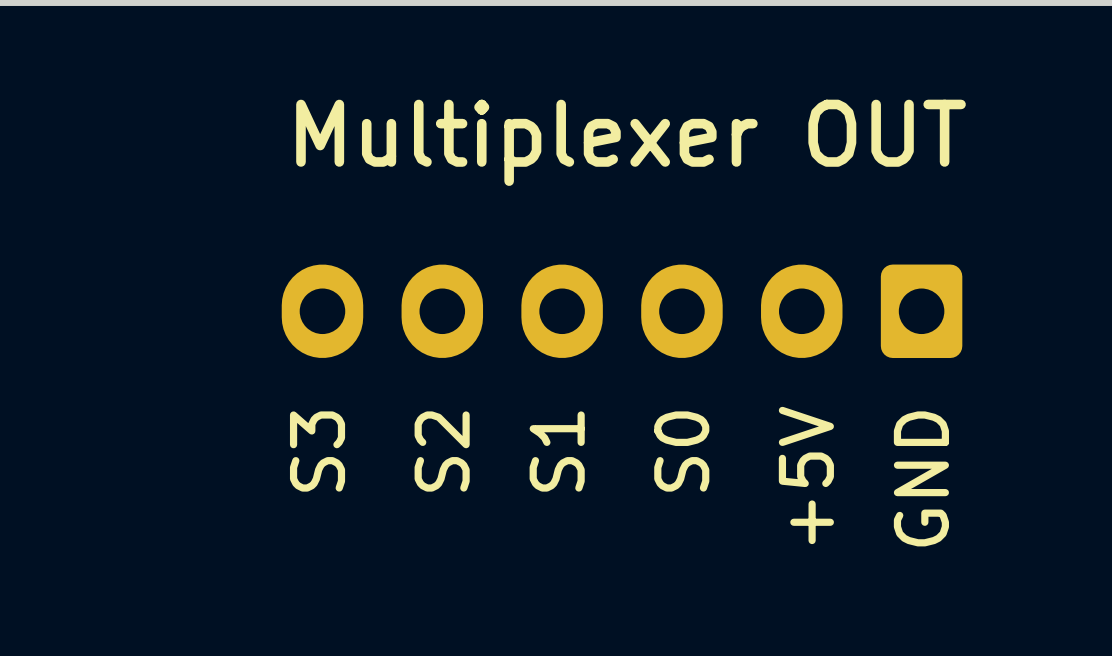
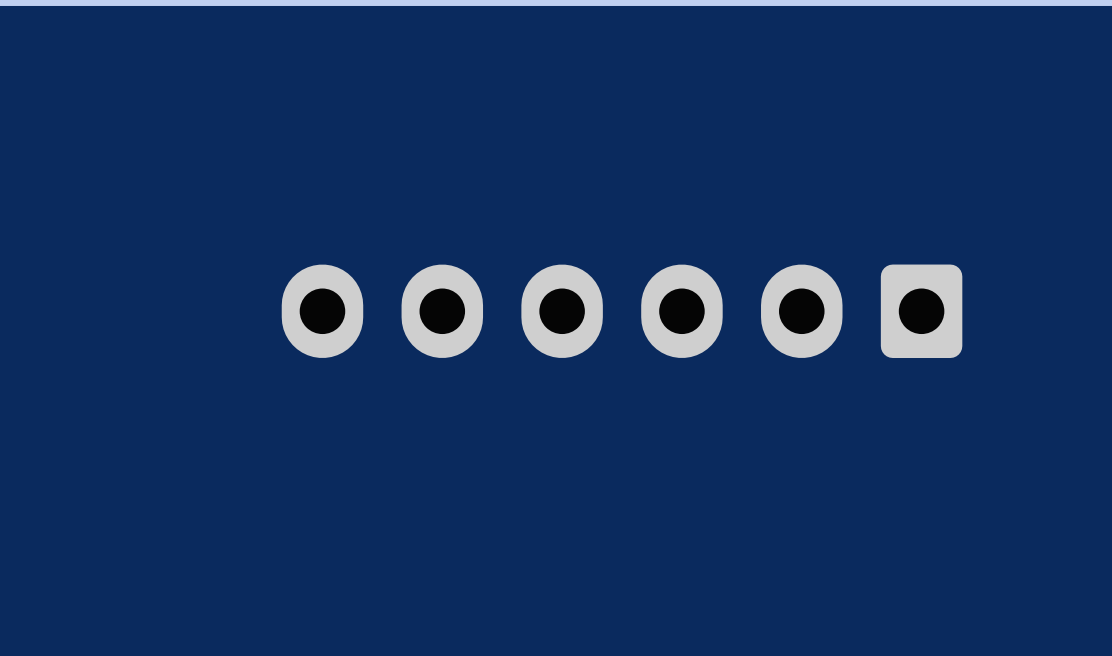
text: Multiplexer OUT (631, 142) -> none
text: S3 (317, 451) -> none
text: S2 (442, 451) -> none
text: S1 (557, 451) -> none
text: S0 (681, 451) -> none
text: +5V (806, 475) -> none
text: GND (921, 478) -> none

